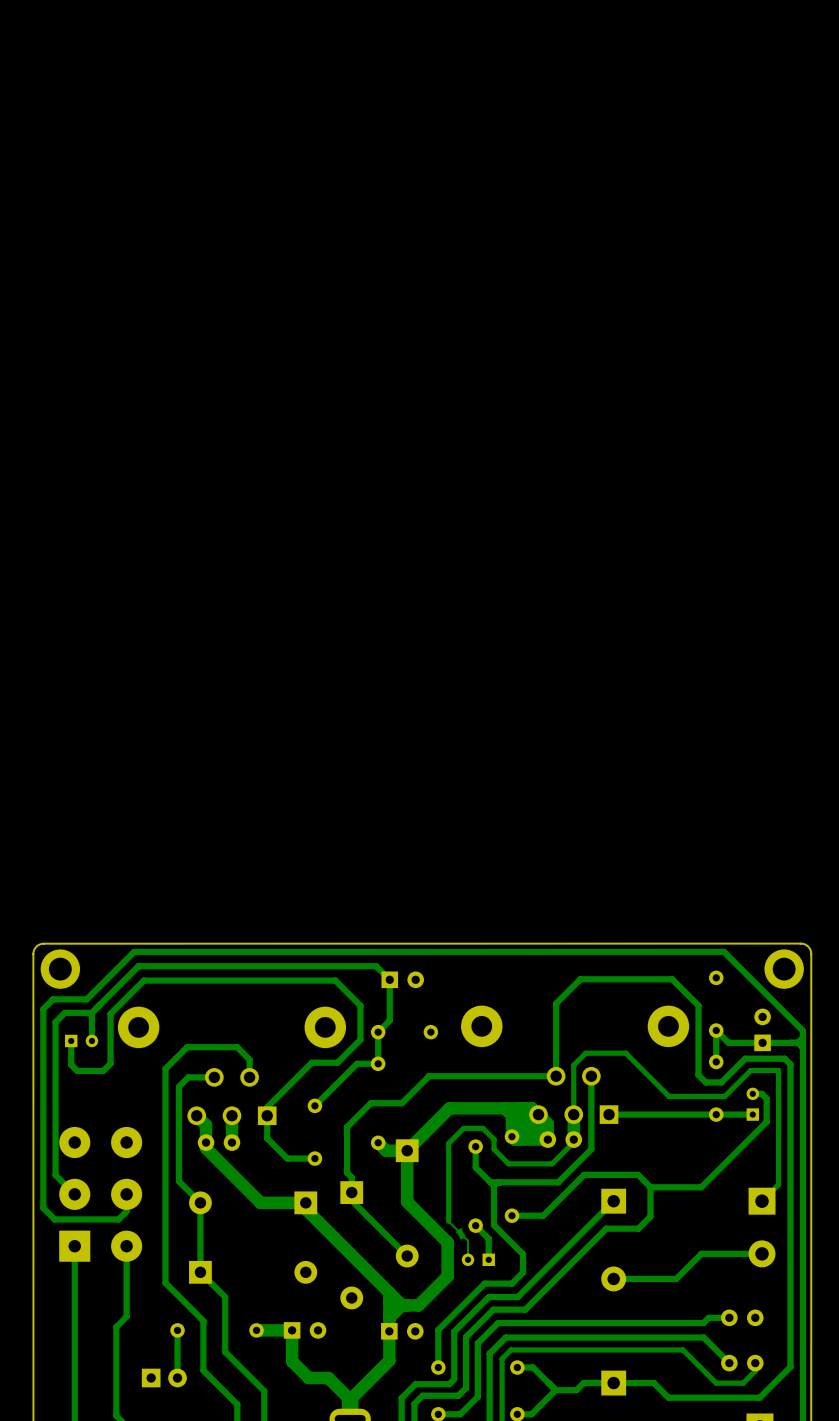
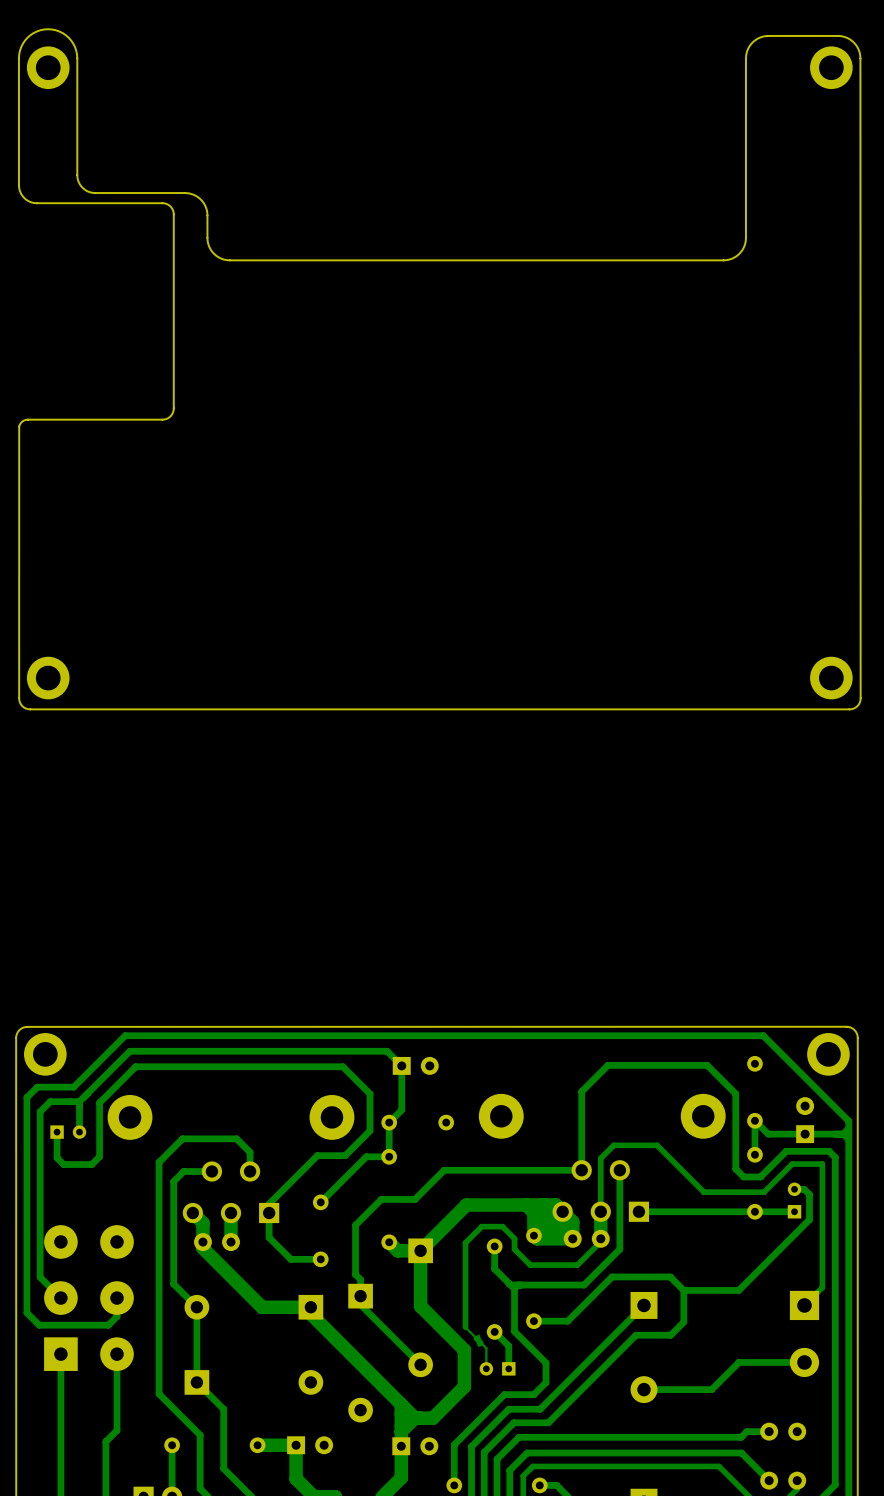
board edge: none -> (837, 35) (765, 36) (754, 40) (748, 48) (745, 58) (745, 240) (741, 251) (730, 259) (229, 260) (217, 256) (209, 247) (207, 240) (206, 210) (202, 201) (194, 195) (185, 193) (93, 192) (81, 186) (77, 175) (76, 50) (68, 37) (59, 31) (44, 29) (30, 35) (22, 43) (18, 58) (18, 185) (22, 196) (29, 201) (36, 203) (163, 203) (169, 205) (173, 210) (173, 408) (171, 415) (164, 419) (27, 419) (19, 424) (19, 698) (21, 705) (30, 709) (849, 709) (856, 706) (860, 698) (860, 58) (859, 50) (853, 42) (845, 37) (837, 35)
part: none -> (48, 67)
part: none -> (831, 67)
part: none -> (48, 678)
part: none -> (831, 678)

